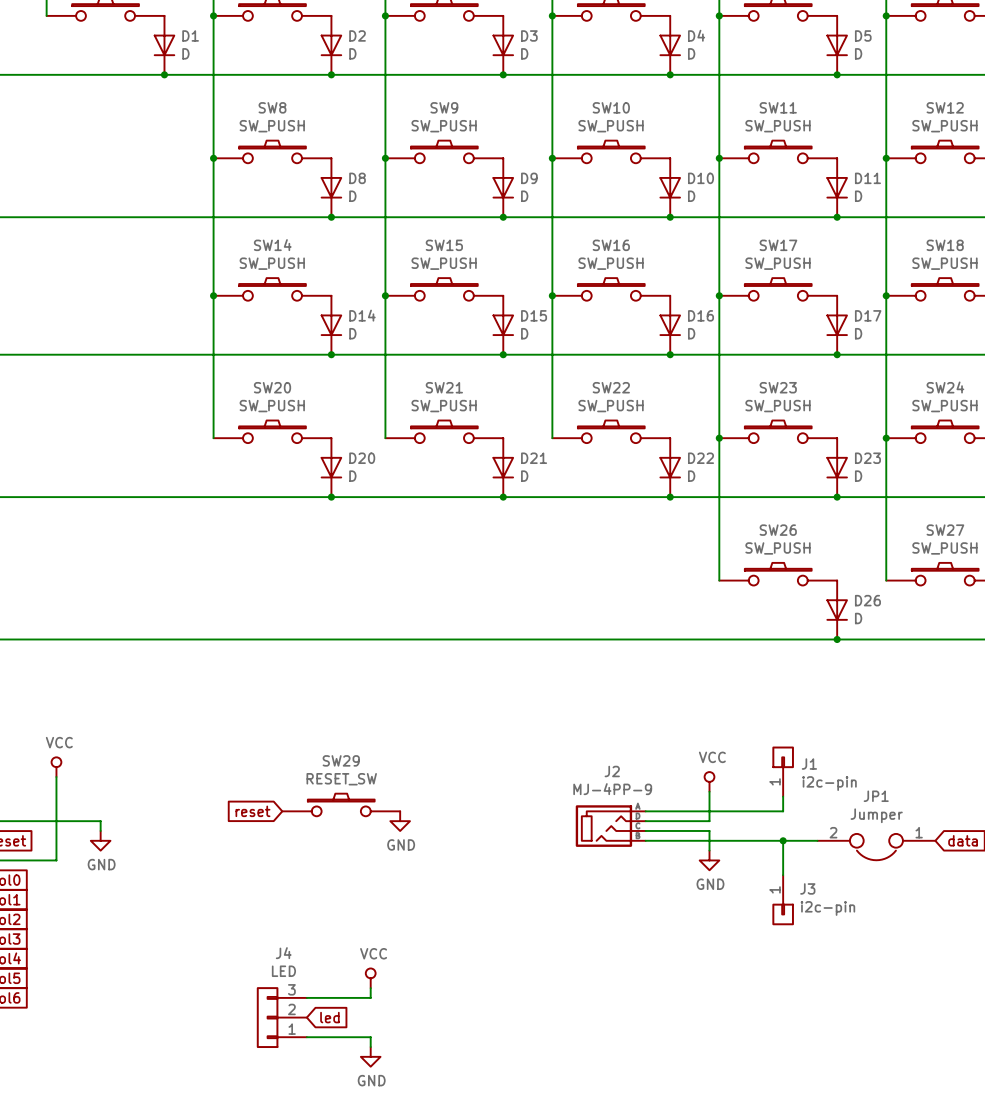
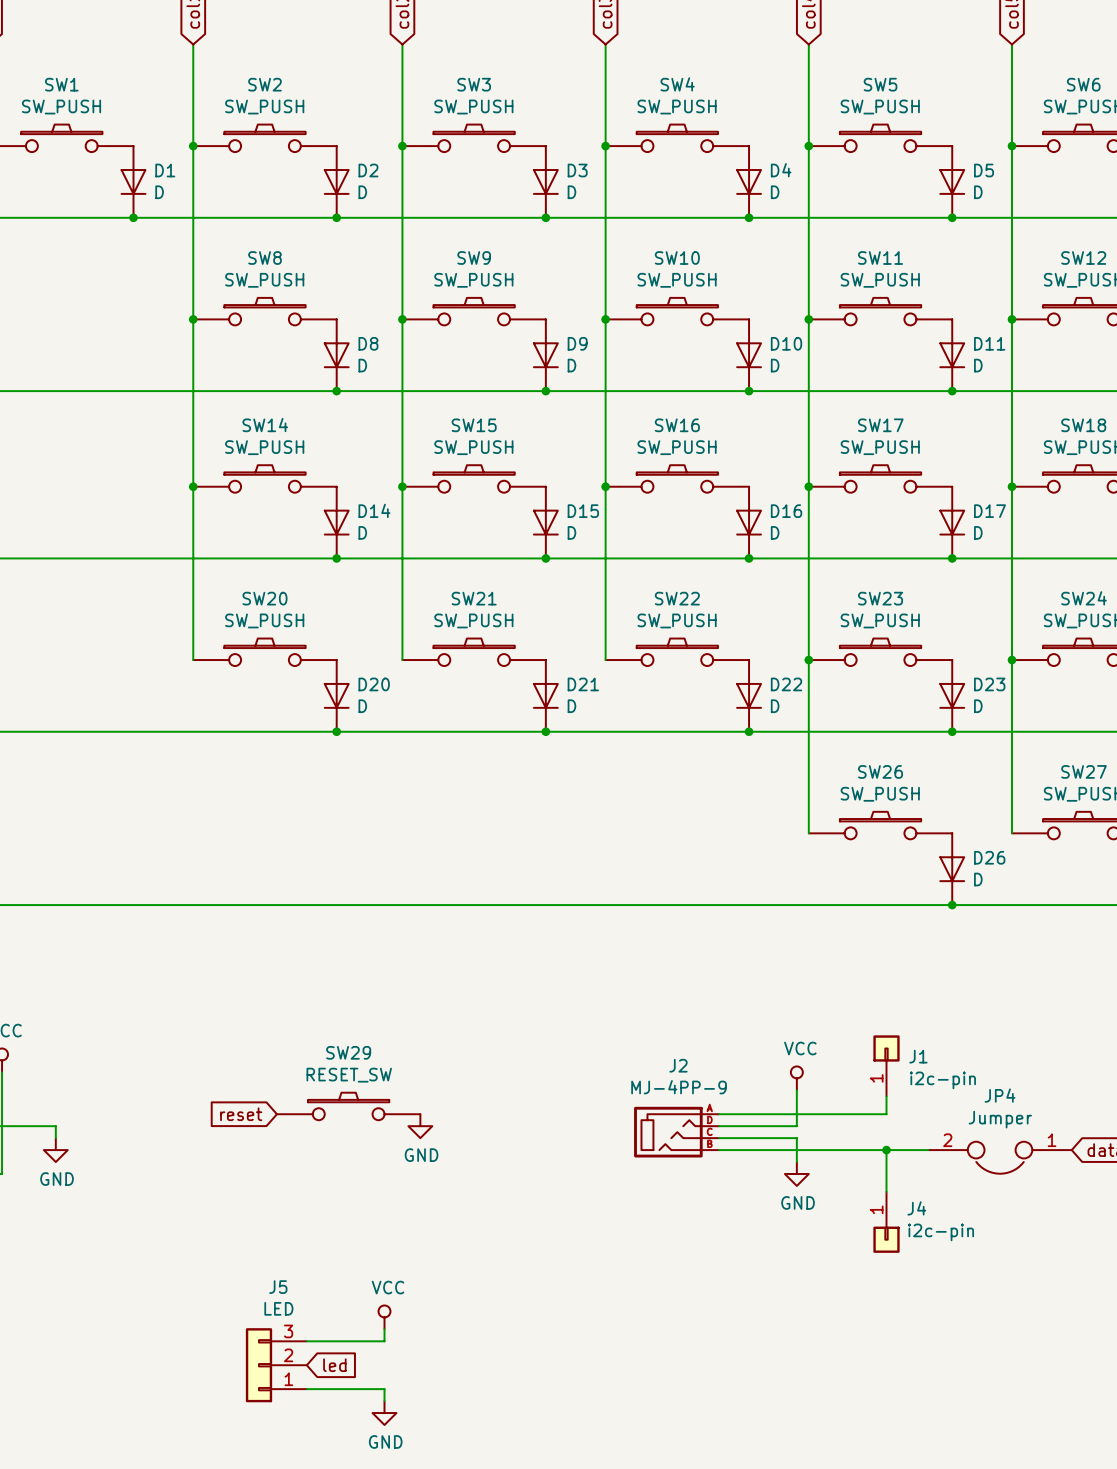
JP1 name: JP1 (876, 796) -> JP4 (1000, 1095)
J3 name: J3 (807, 888) -> J4 (916, 1208)
J4 name: J4 (283, 953) -> J5 (278, 1287)

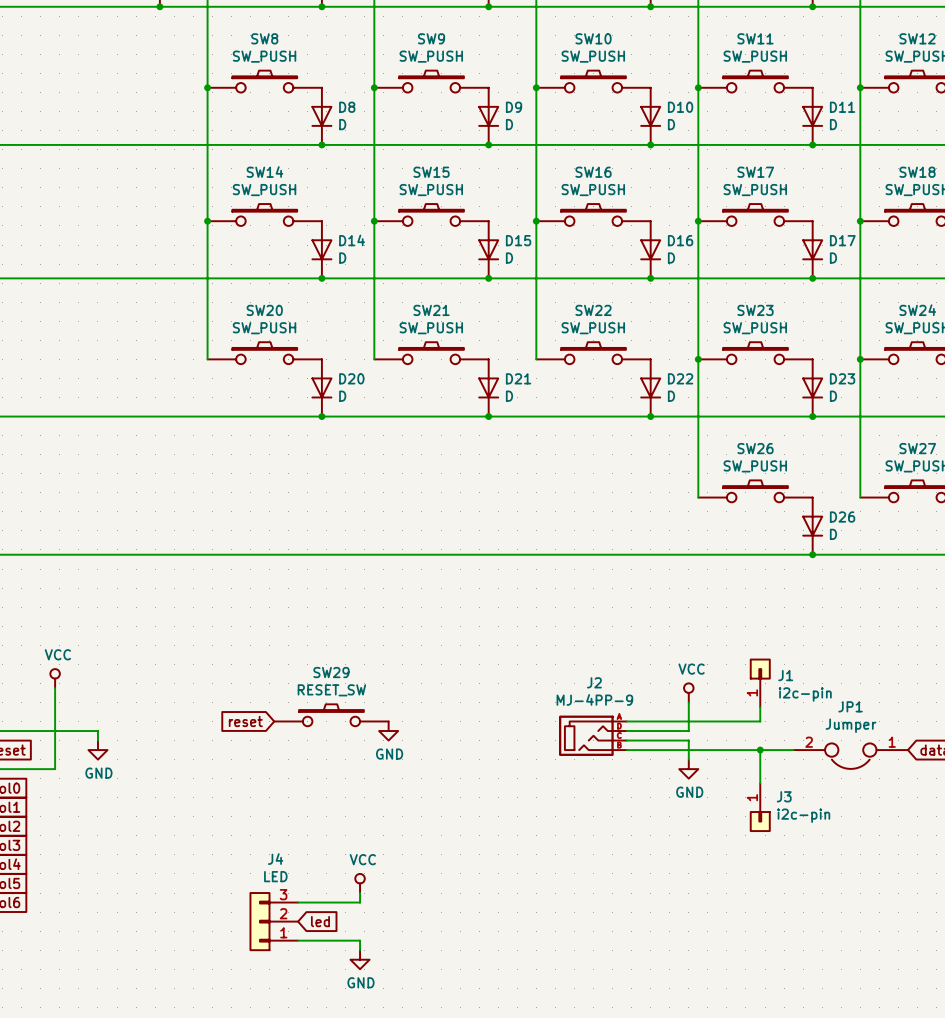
JP4 name: JP4 (1000, 1095) -> JP1 (850, 706)
J4 name: J4 (916, 1208) -> J3 (784, 796)
J5 name: J5 (278, 1287) -> J4 (275, 859)

